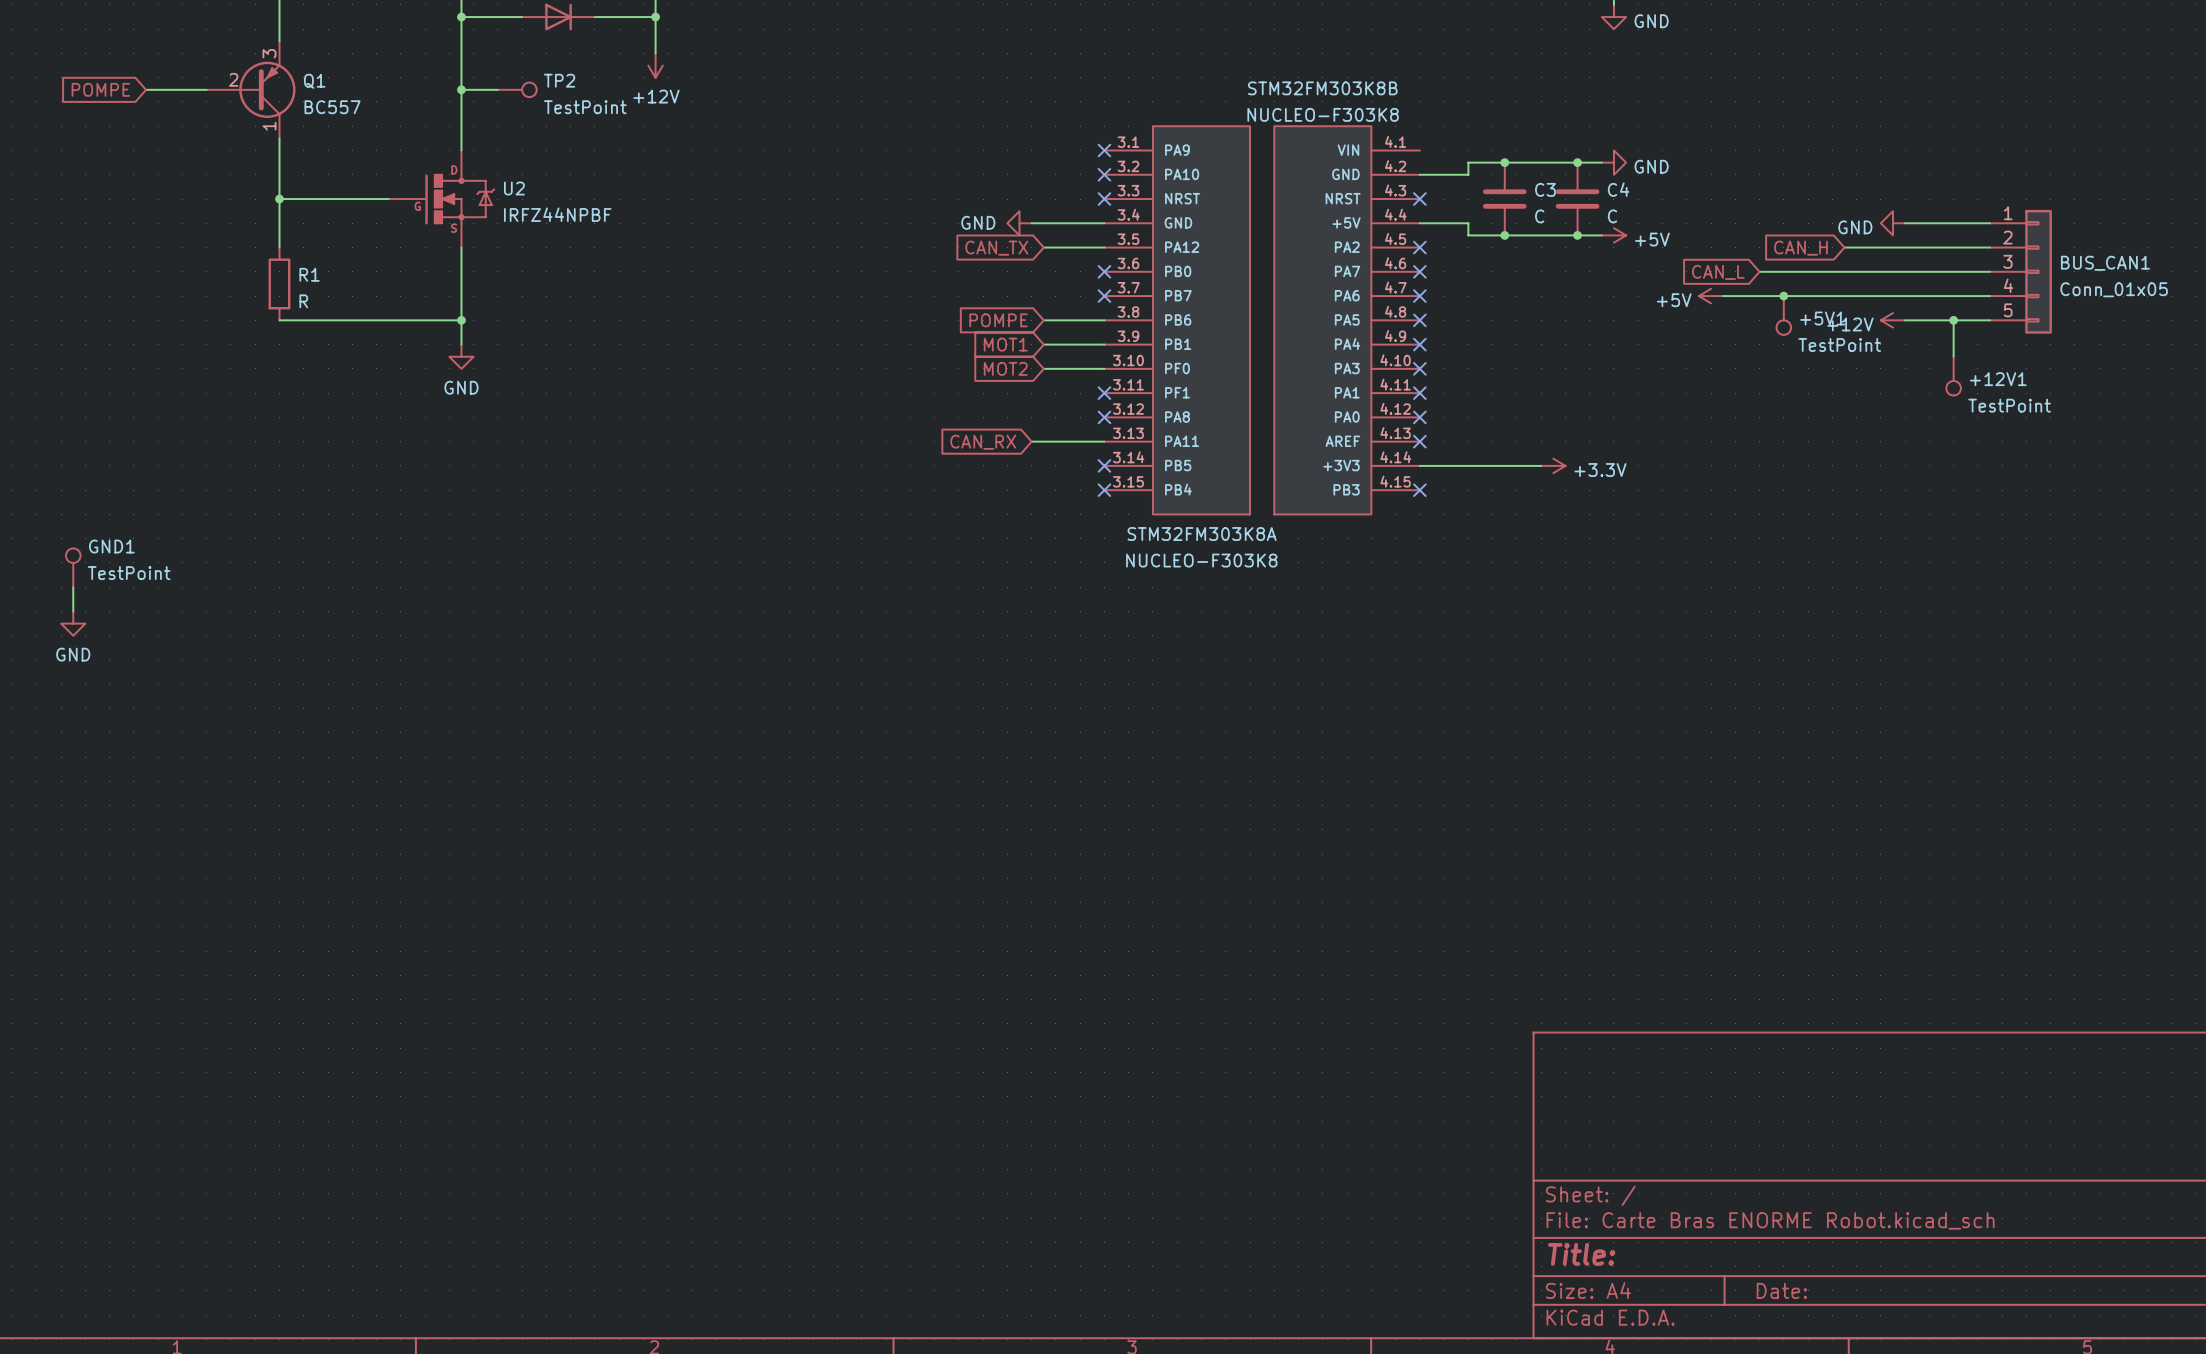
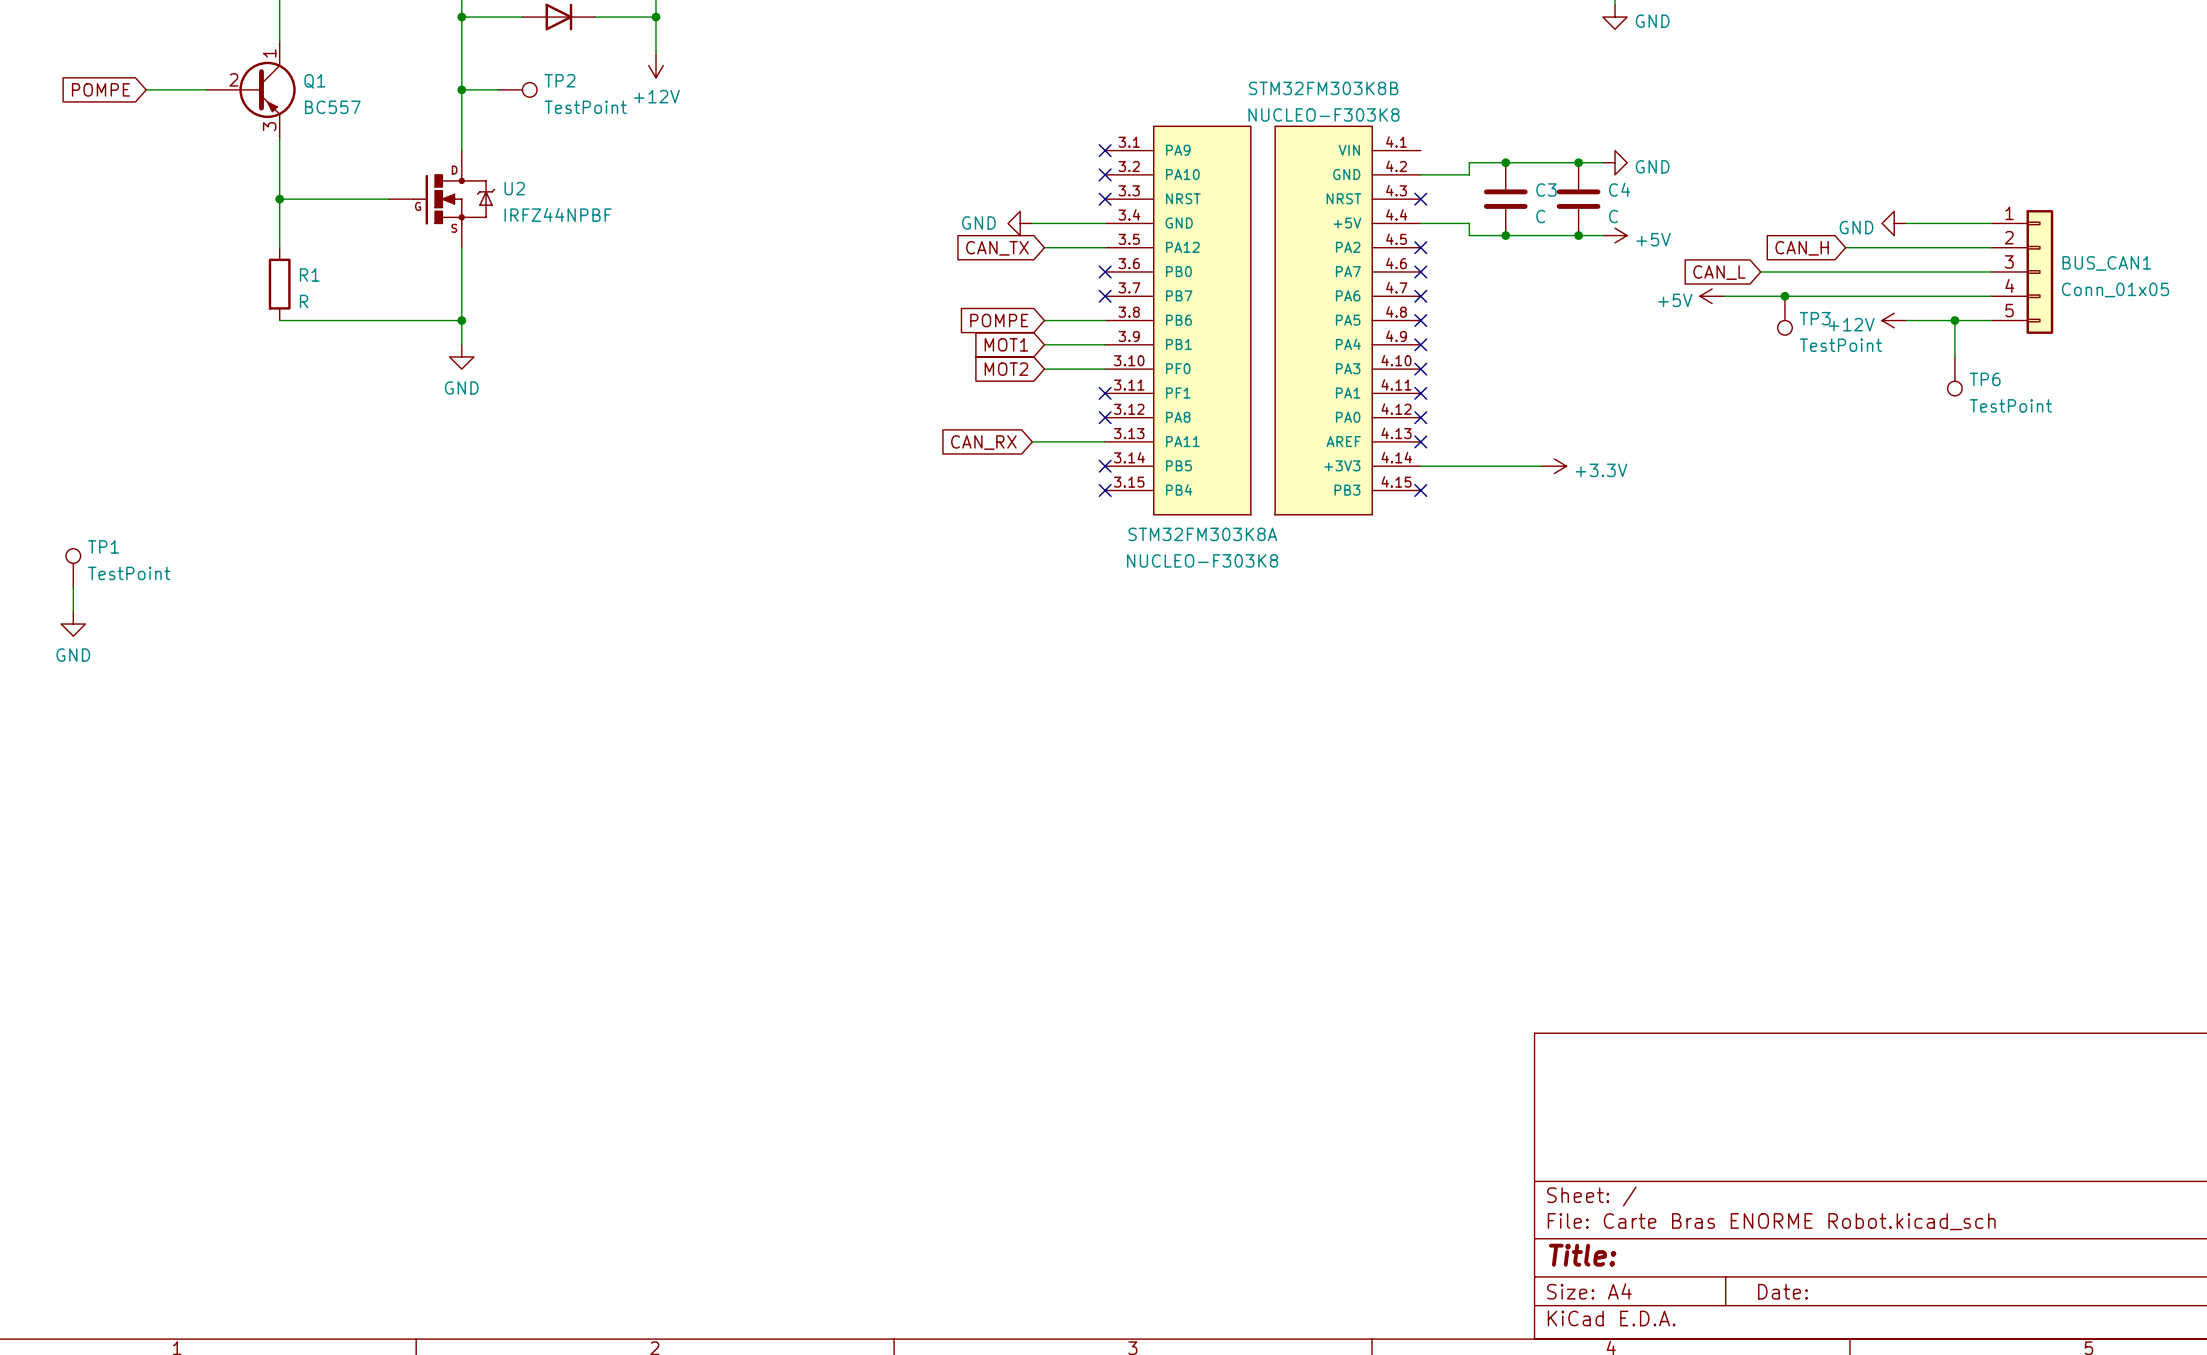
Q1 flip: as is (267, 89) -> up-down (267, 89)
+5V1 name: +5V1 (1822, 318) -> TP3 (1815, 318)
+12V1 name: +12V1 (1998, 379) -> TP6 (1985, 379)
GND1 name: GND1 (111, 546) -> TP1 (103, 546)

